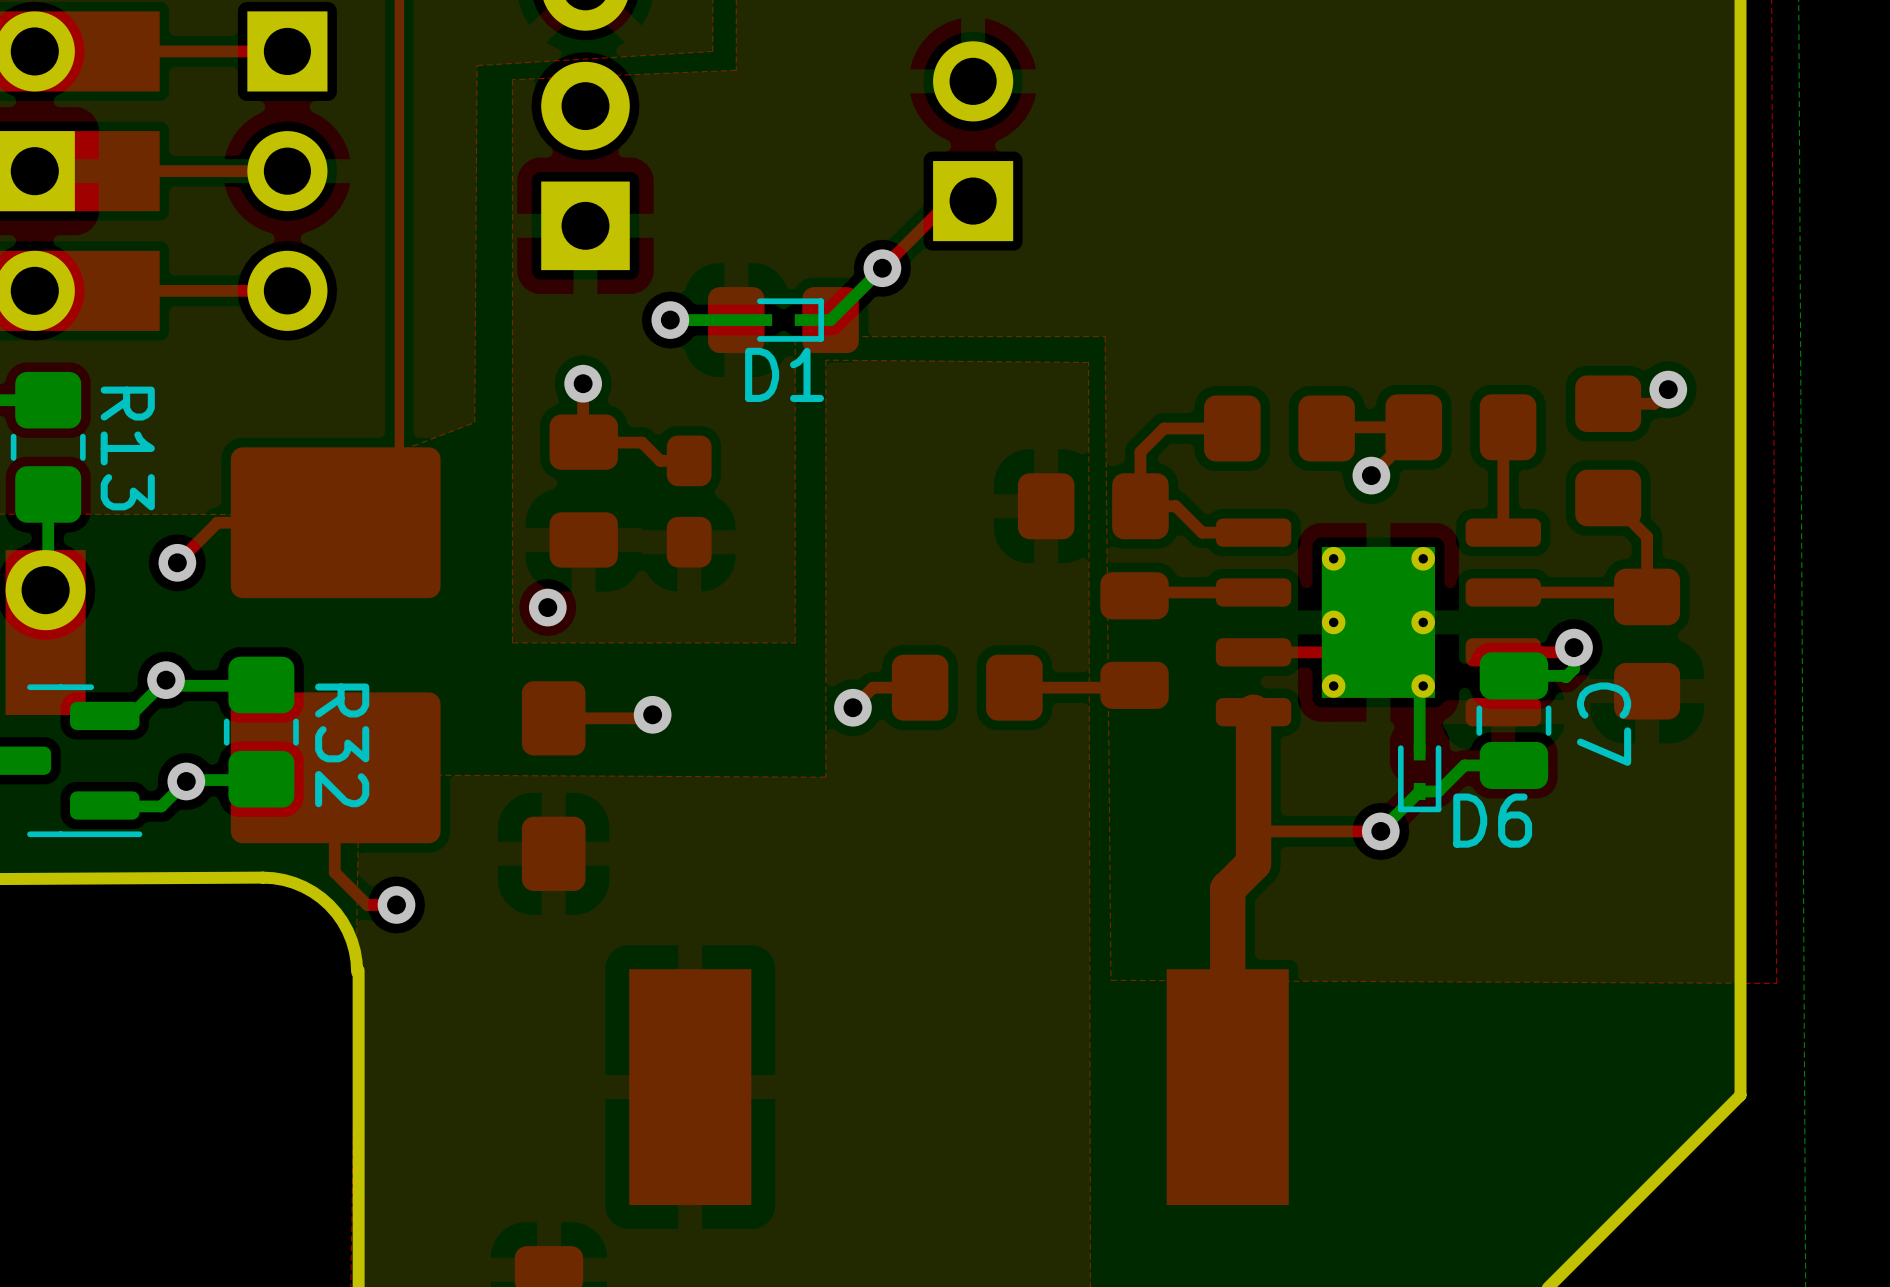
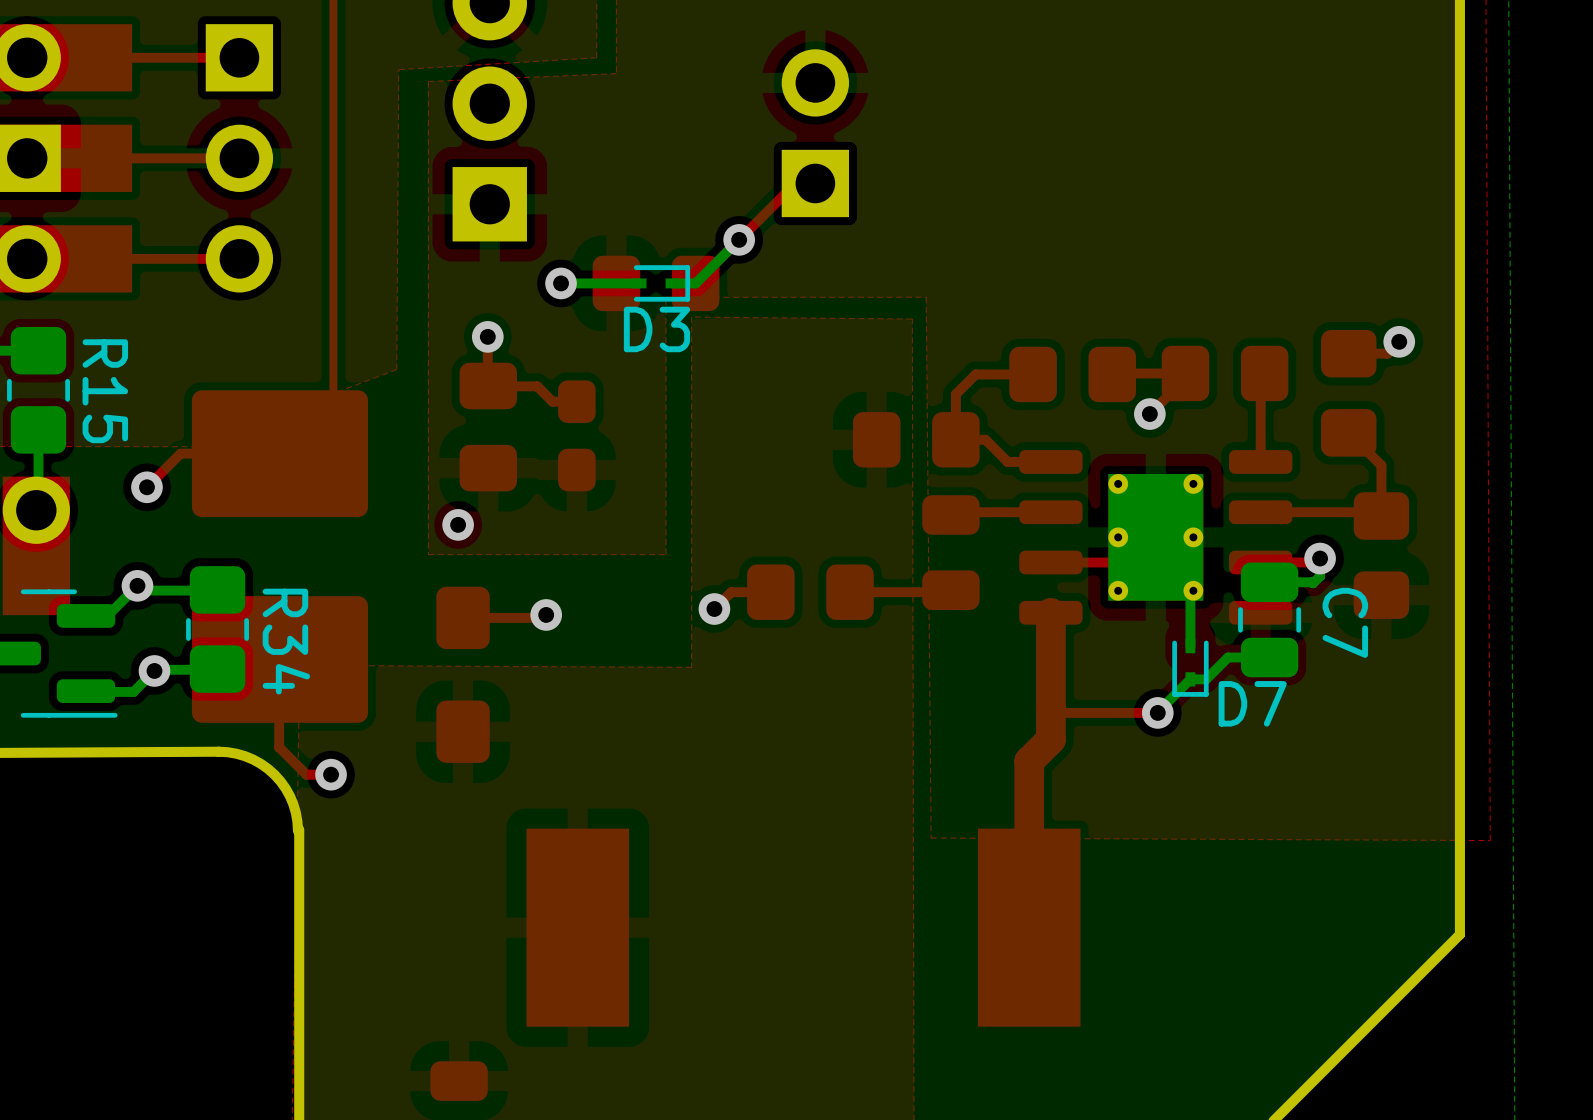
D1 name: D1 (784, 374) -> D3 (656, 329)
R13 name: R13 (127, 448) -> R15 (105, 391)
R32 name: R32 (342, 745) -> R34 (286, 641)
D6 name: D6 (1492, 820) -> D7 (1252, 703)

